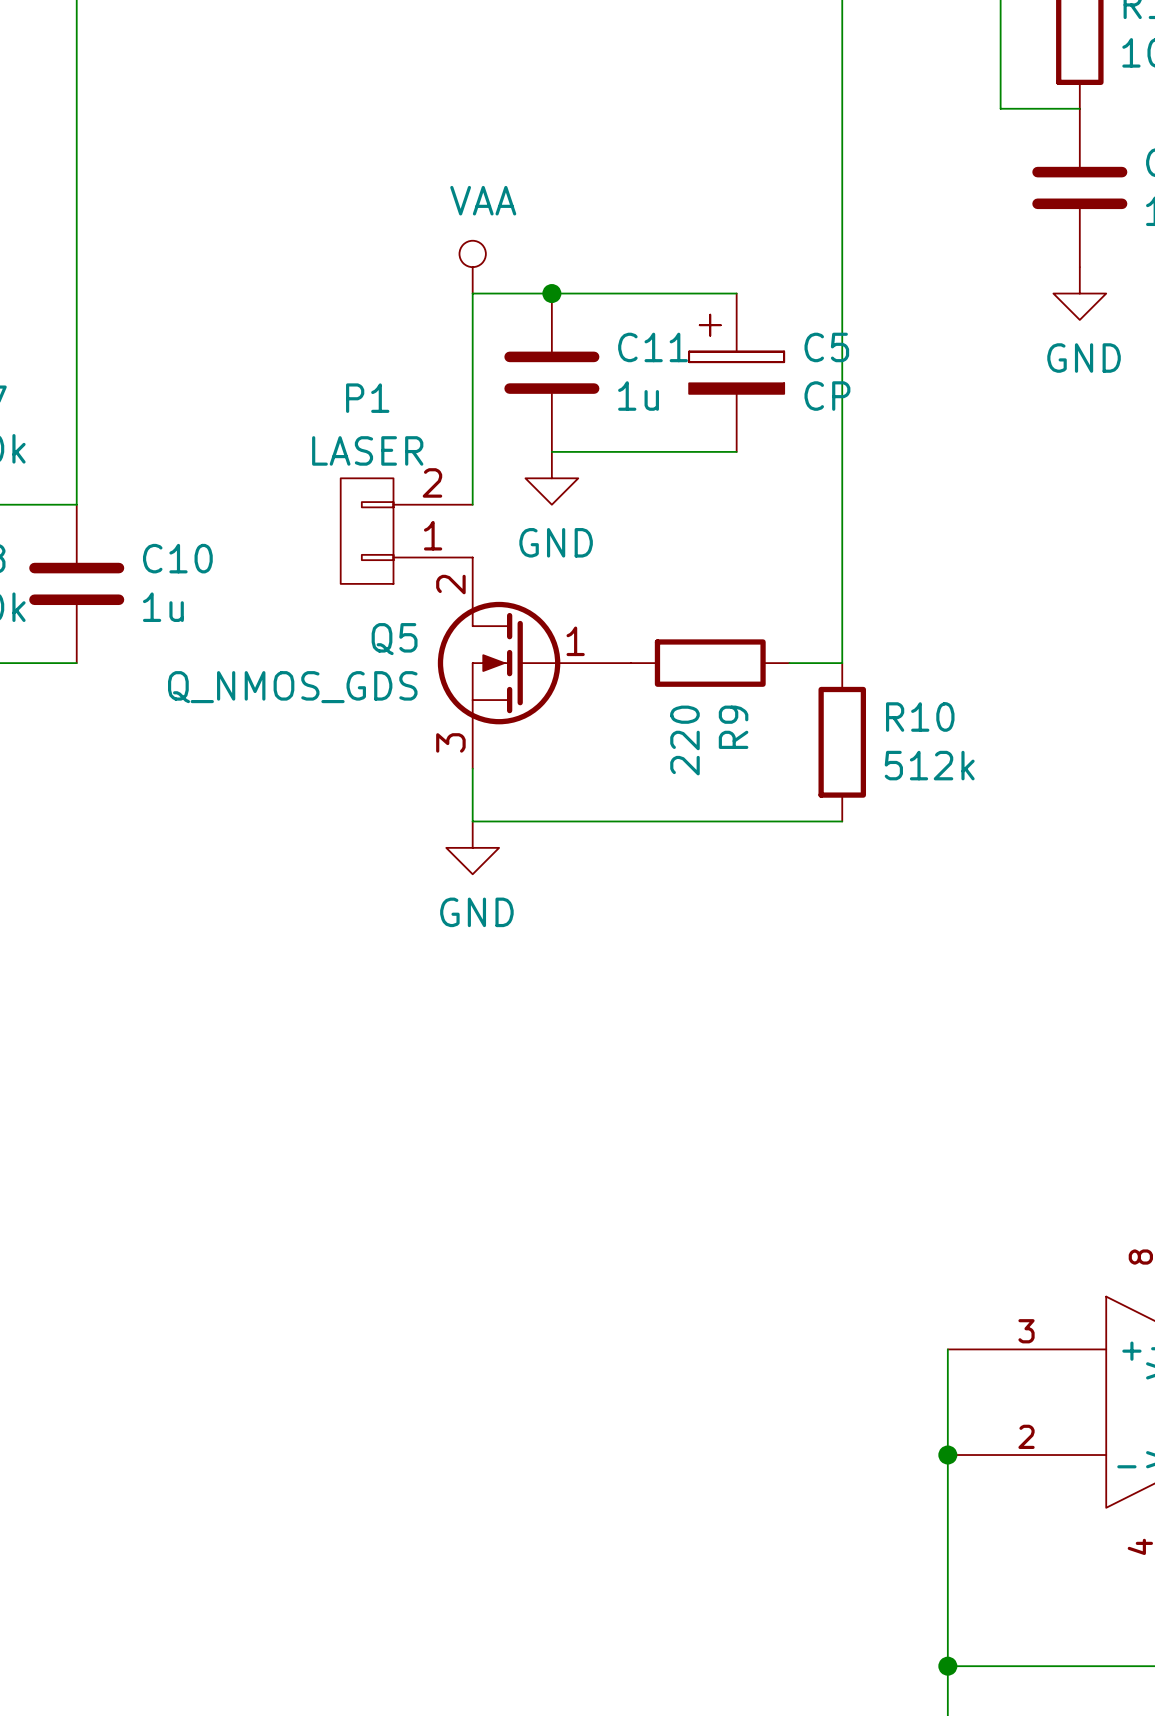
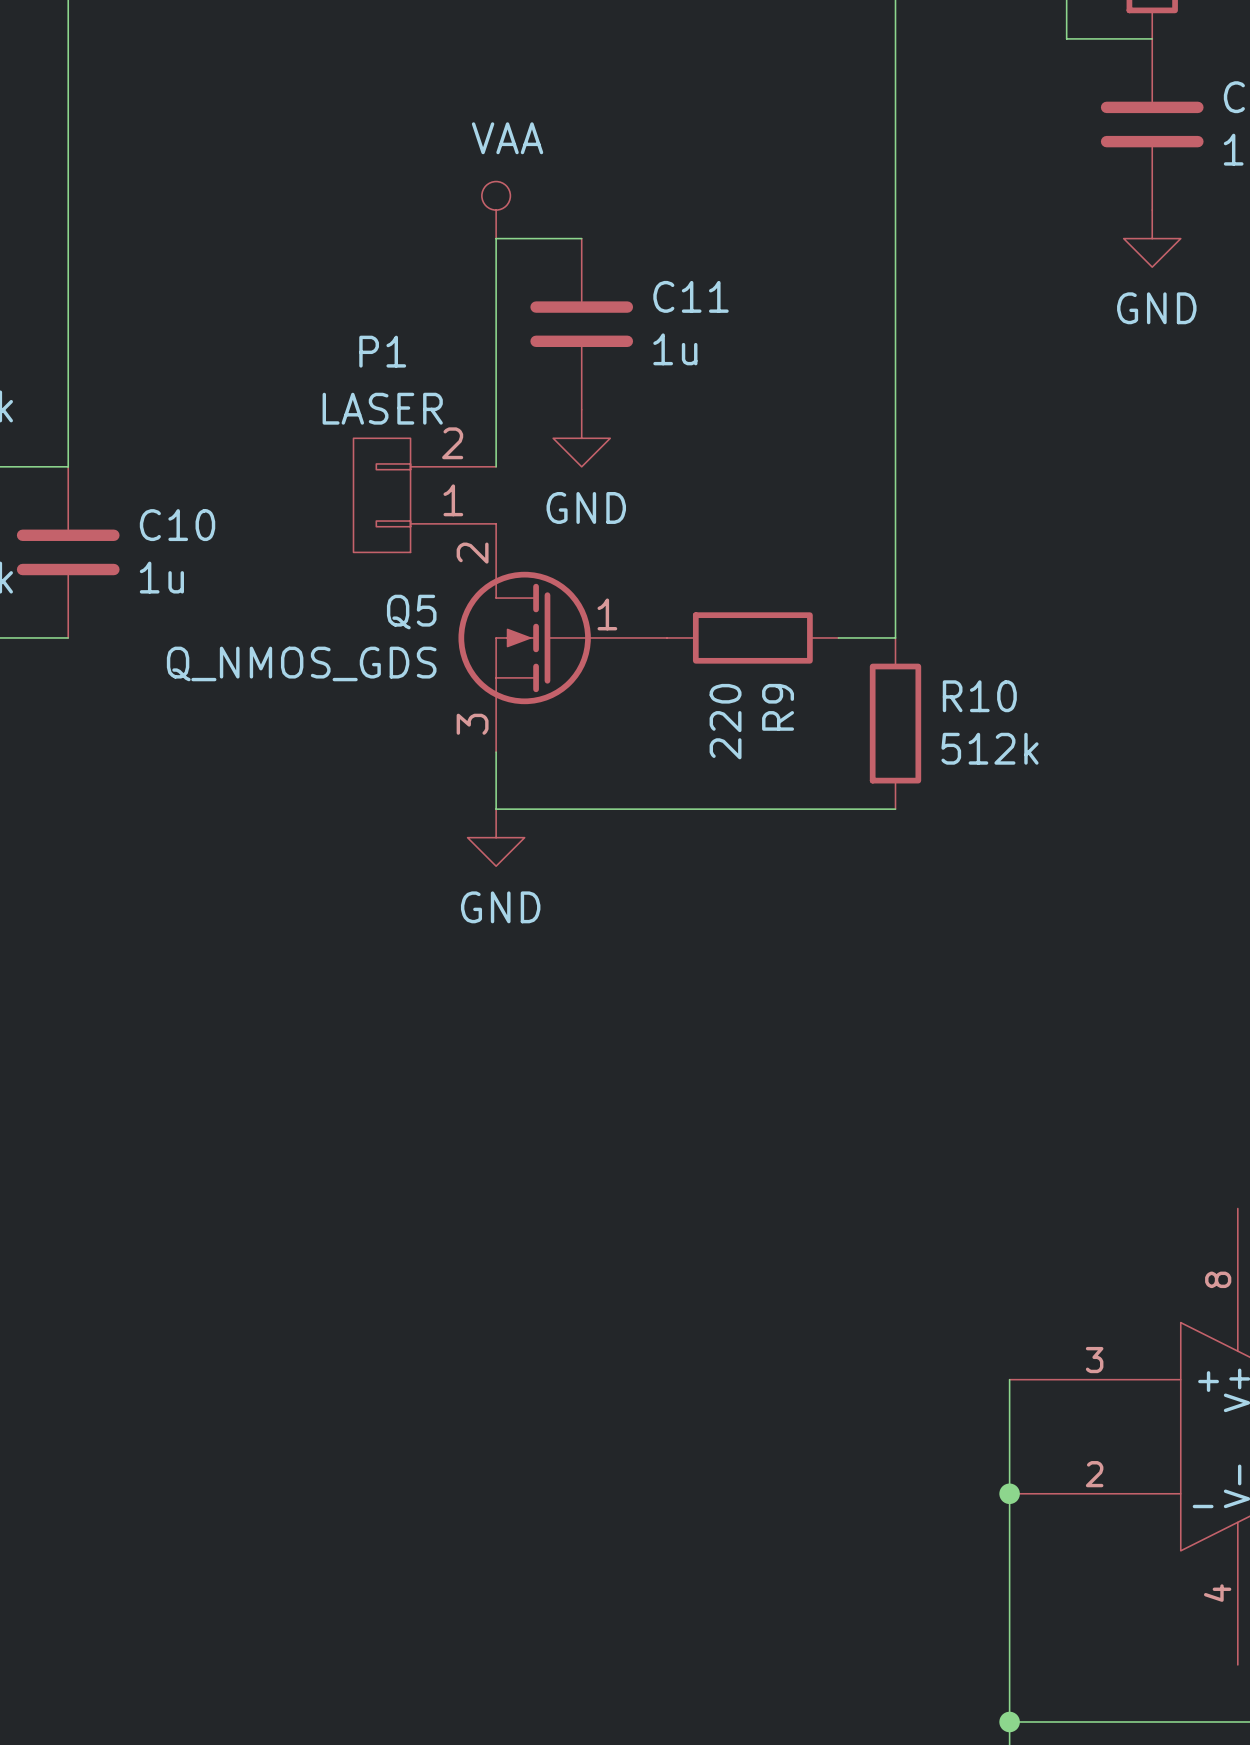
wire: (551, 293) (736, 293) -> none
junction: (551, 293) -> none
C5: CP (736, 372) -> none
wire: (551, 451) (736, 451) -> none

